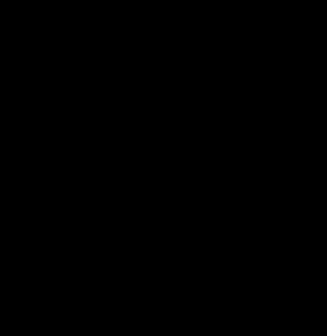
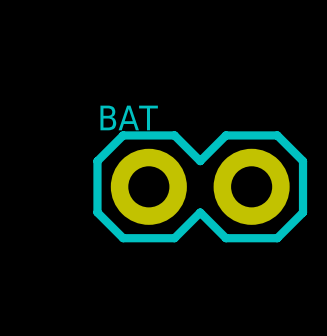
BAT: none -> (200, 186)

